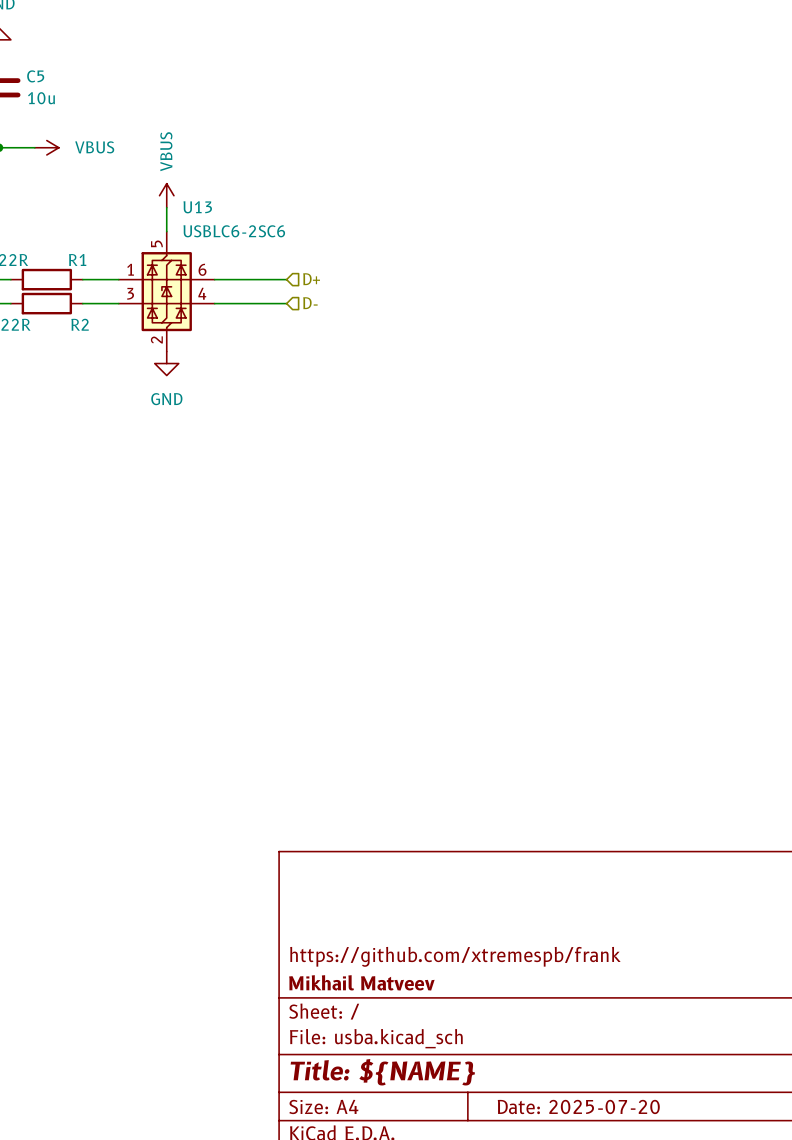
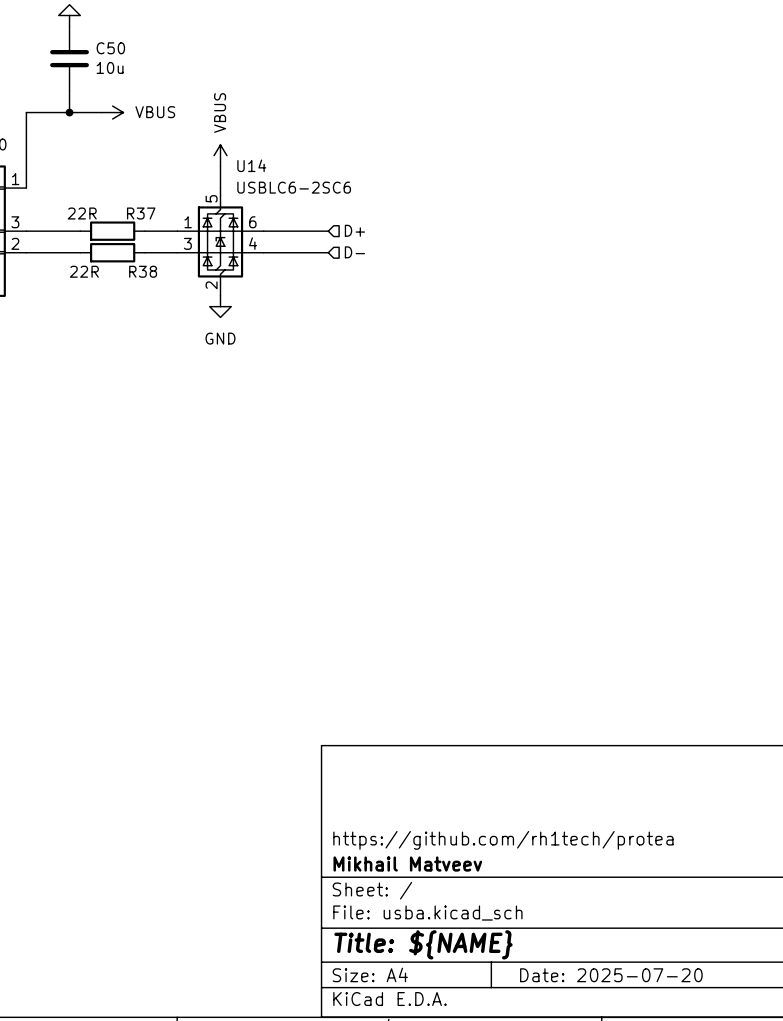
C5 name: C5 (35, 76) -> C50 (110, 48)
U13 name: U13 (197, 207) -> U14 (251, 165)
R1 name: R1 (77, 259) -> R37 (141, 213)
R2 name: R2 (80, 324) -> R38 (143, 271)
title block: https://github.com/xtremespb/frank (455, 956) -> https://github.com/rh1tech/protea (503, 840)

